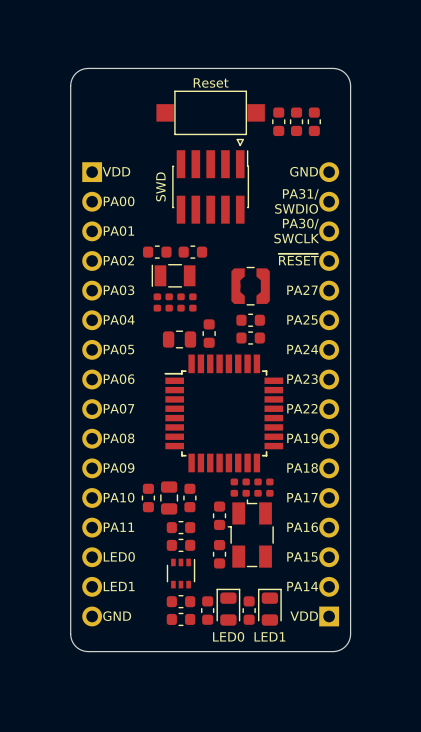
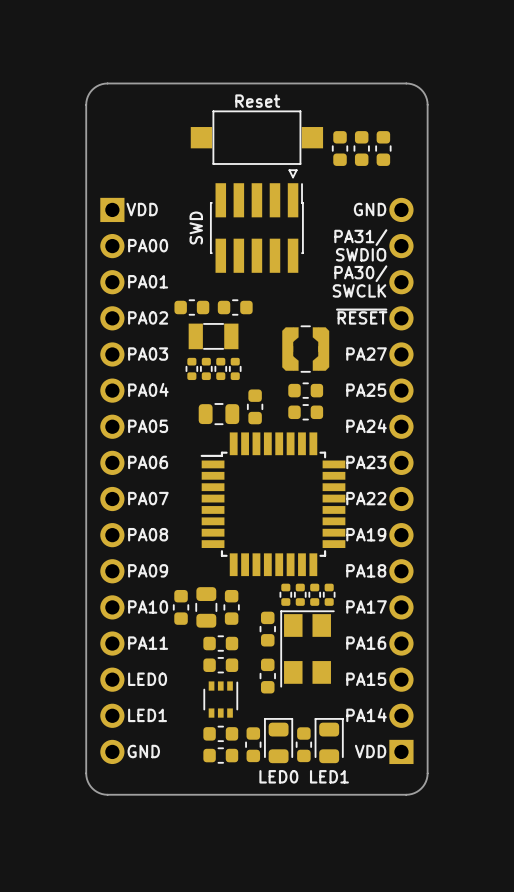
part footprint: [151, 264, 196, 288] -> [188, 323, 239, 350]
part footprint: [153, 293, 162, 312] -> [185, 357, 199, 381]
part footprint: [165, 293, 173, 312] -> [200, 357, 213, 381]
part footprint: [177, 293, 185, 312] -> [214, 357, 228, 381]
part footprint: [189, 293, 197, 312] -> [228, 357, 242, 381]
part footprint: [230, 478, 239, 497] -> [279, 583, 293, 606]
part footprint: [242, 478, 250, 497] -> [294, 583, 307, 606]
part footprint: [254, 478, 262, 497] -> [308, 583, 321, 606]
part footprint: [266, 478, 274, 497] -> [322, 583, 336, 606]
part footprint: [227, 499, 274, 568] -> [280, 610, 335, 688]

